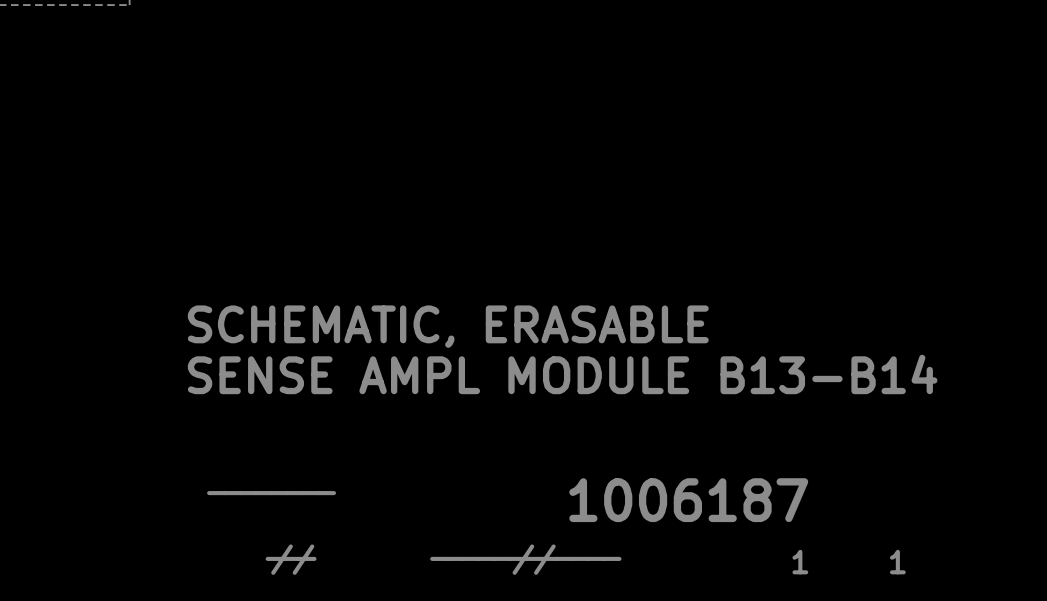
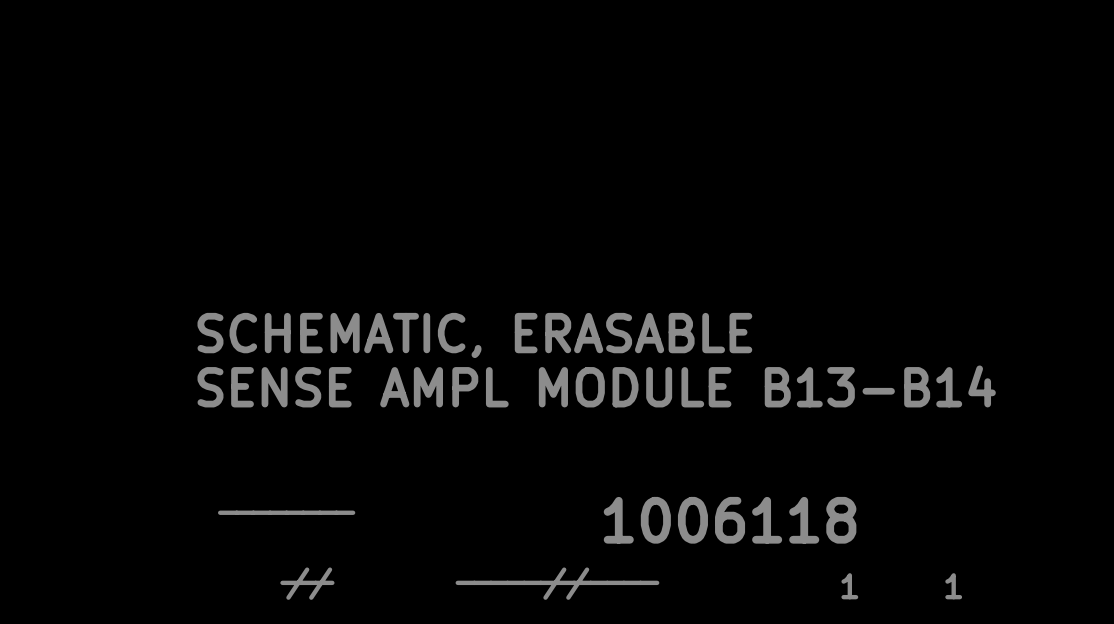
text: 1006187 (688, 500) -> 1006118 (730, 520)

